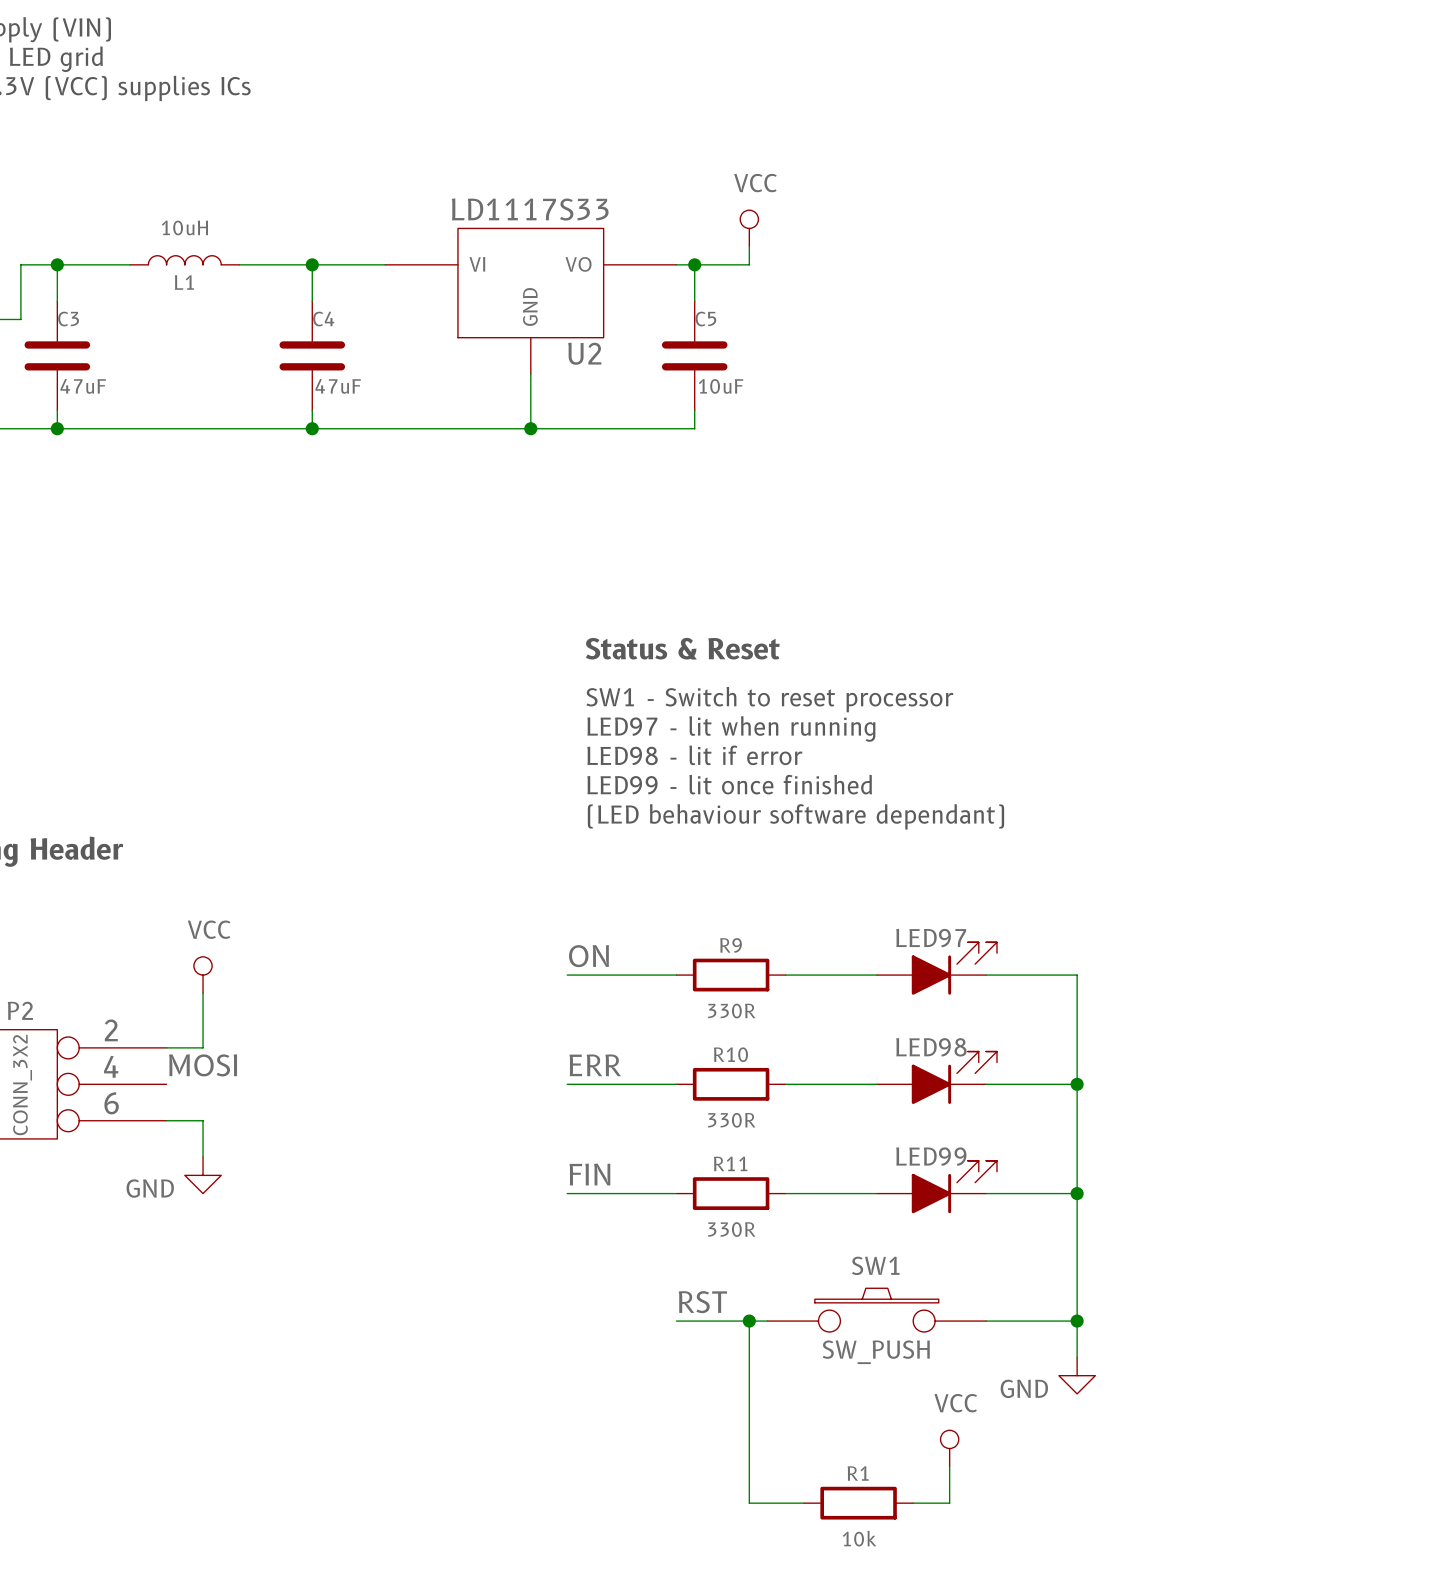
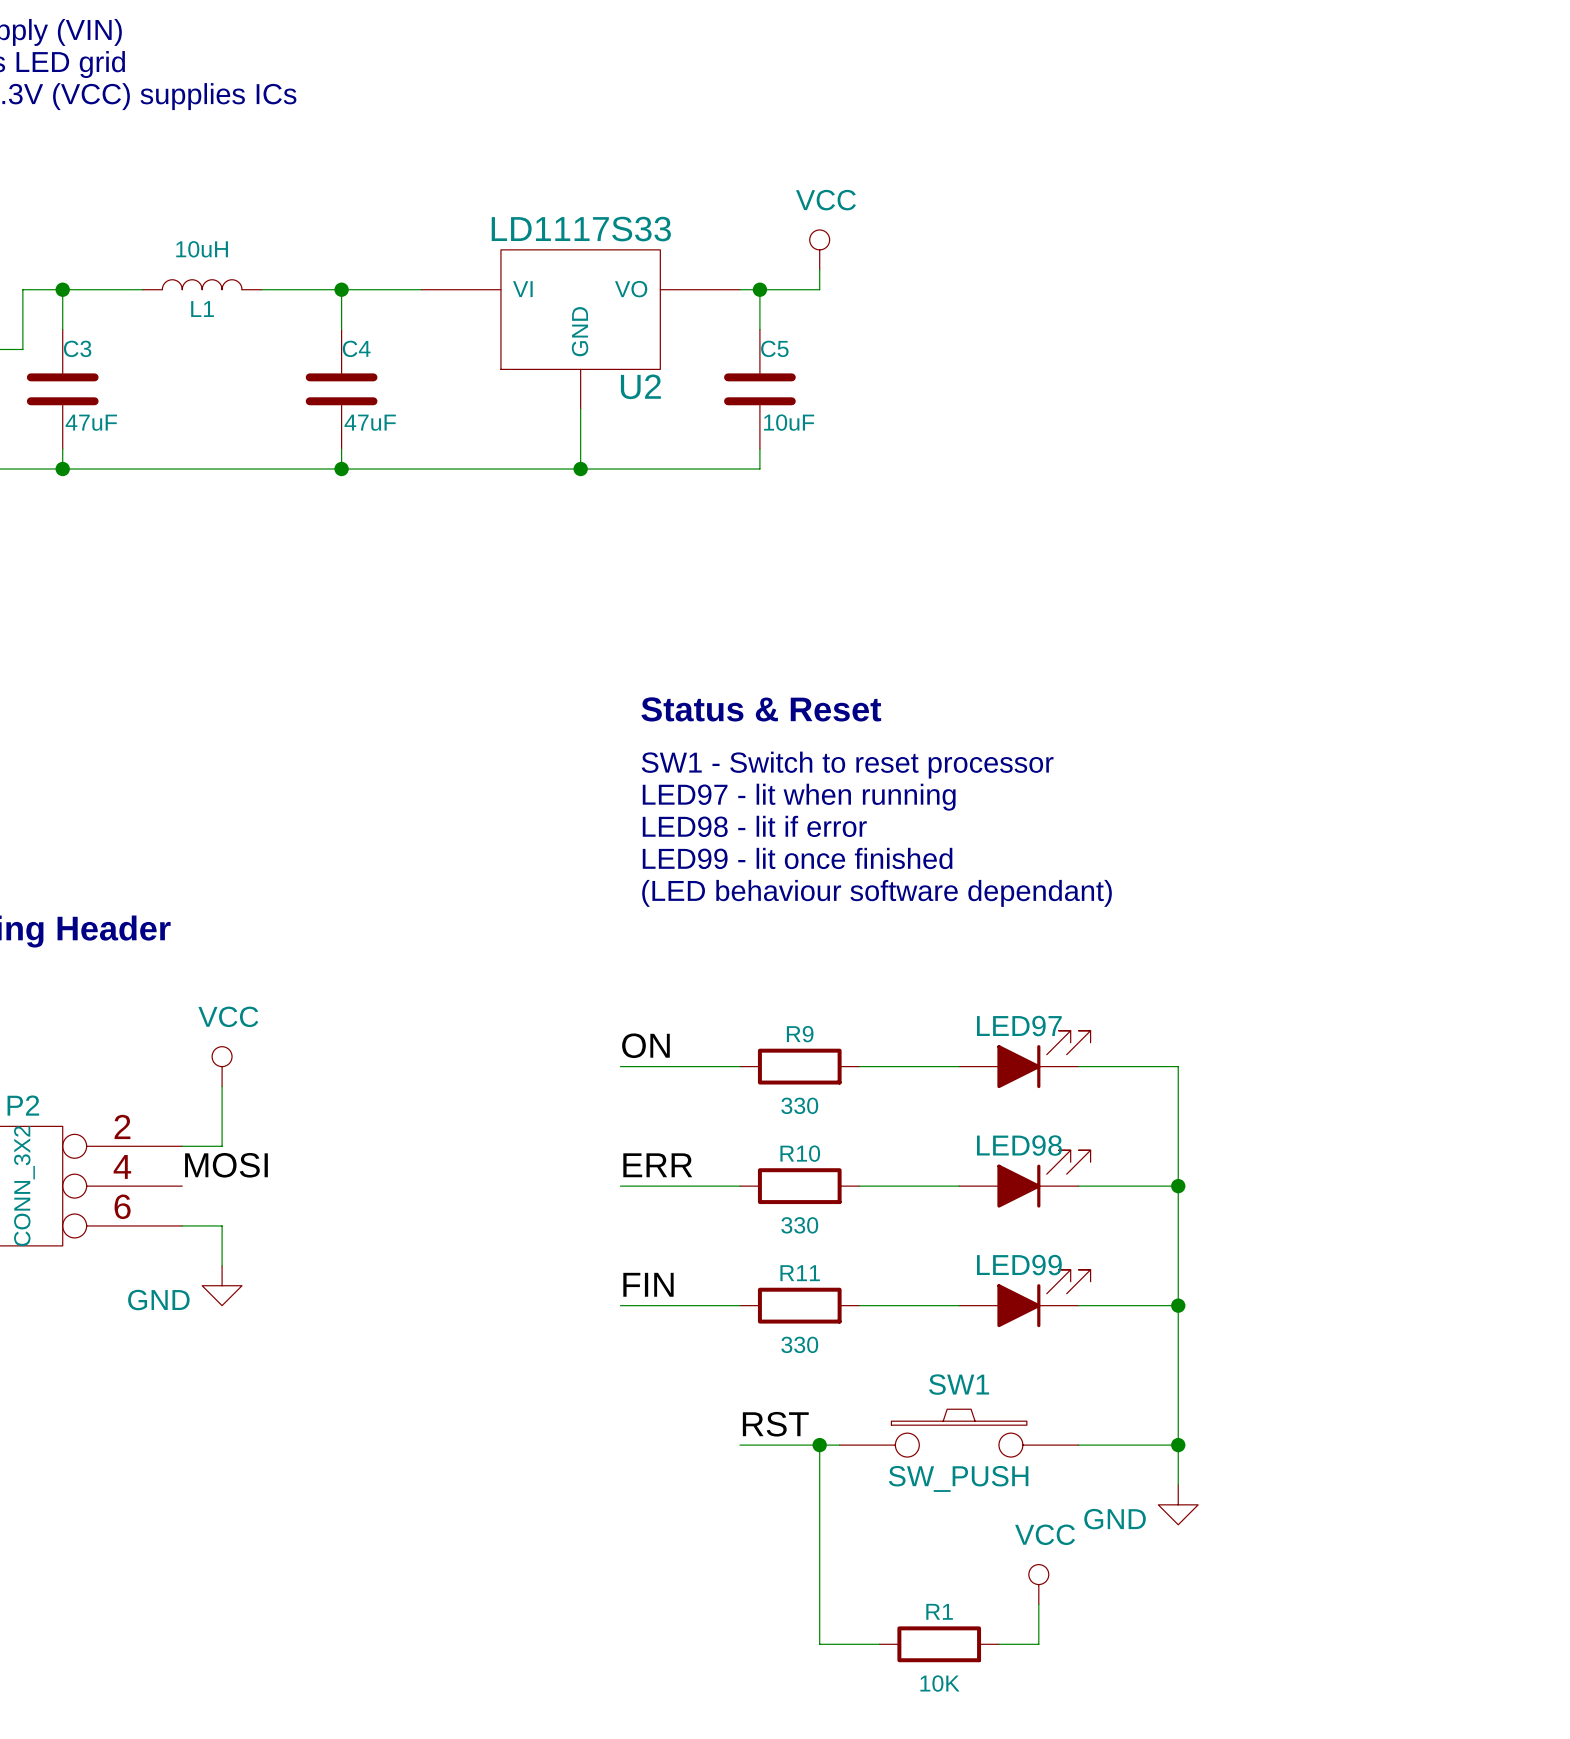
R9 value: 330R (731, 1011) -> 330 (799, 1105)
R10 value: 330R (731, 1120) -> 330 (799, 1225)
R11 value: 330R (731, 1229) -> 330 (799, 1344)
R1 value: 10k (859, 1538) -> 10K (939, 1683)

